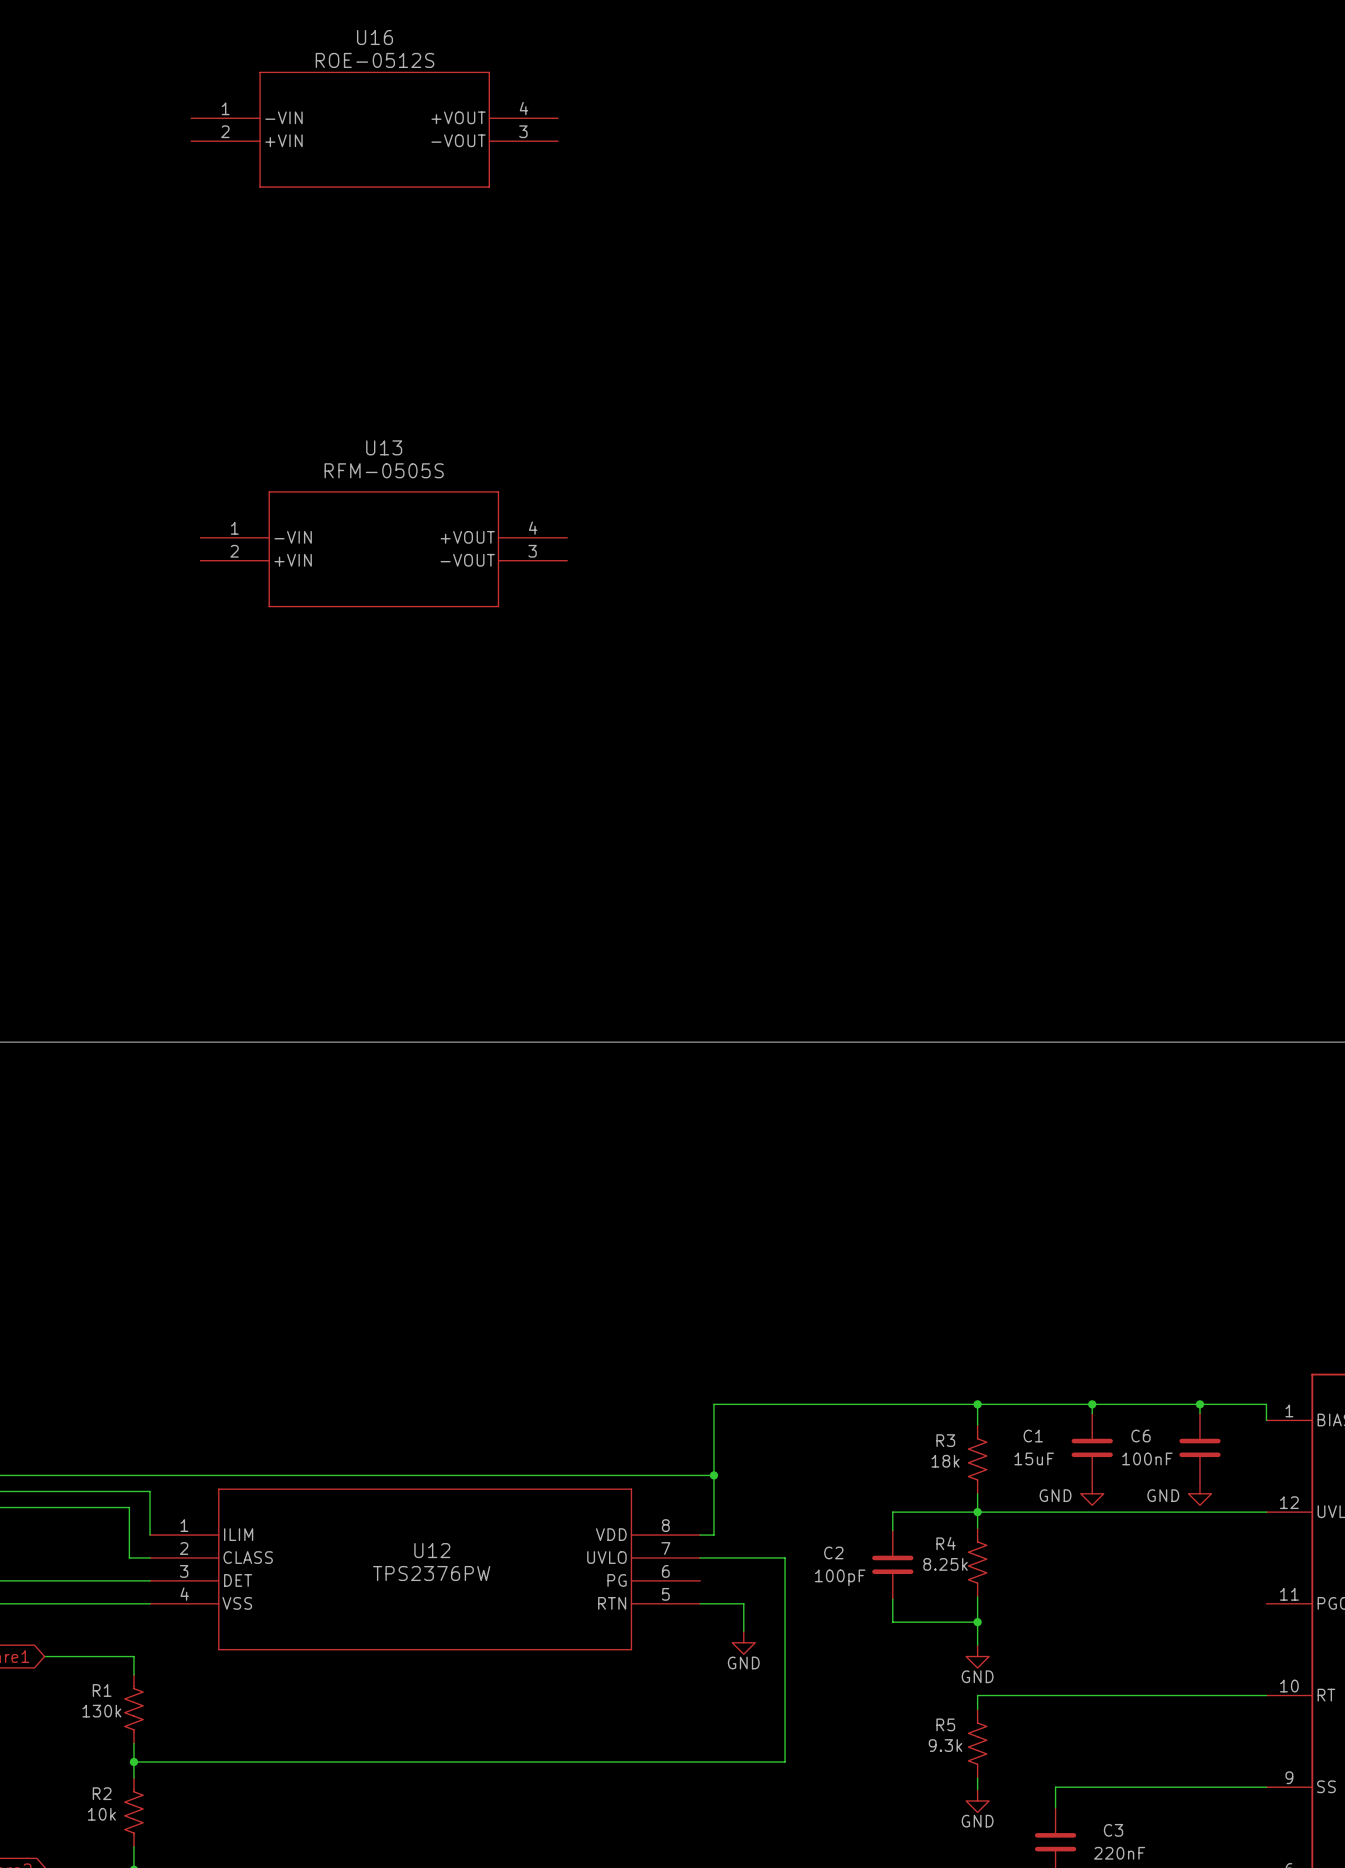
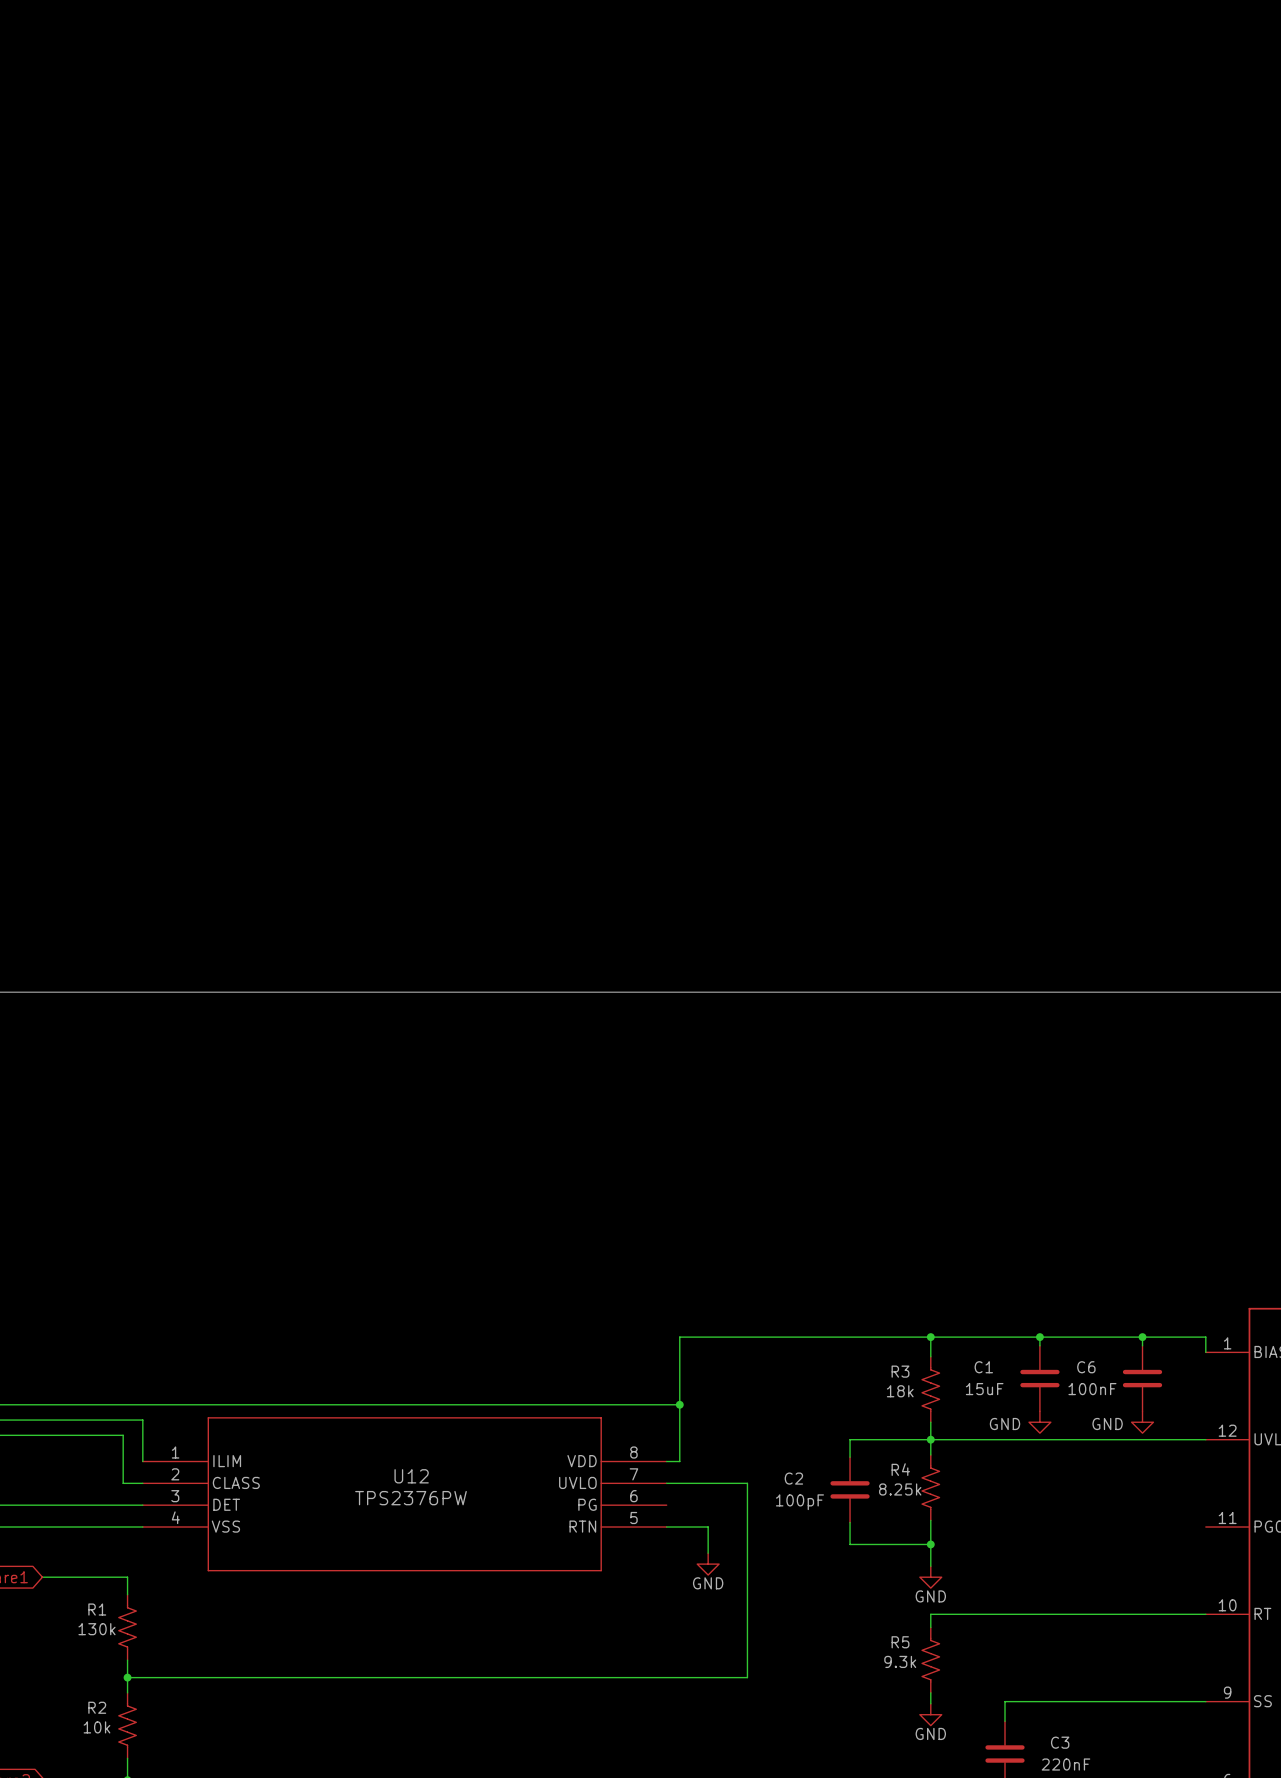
U16: ROE-0512S (374, 129) -> none
U13: RFM-0505S (383, 549) -> none

